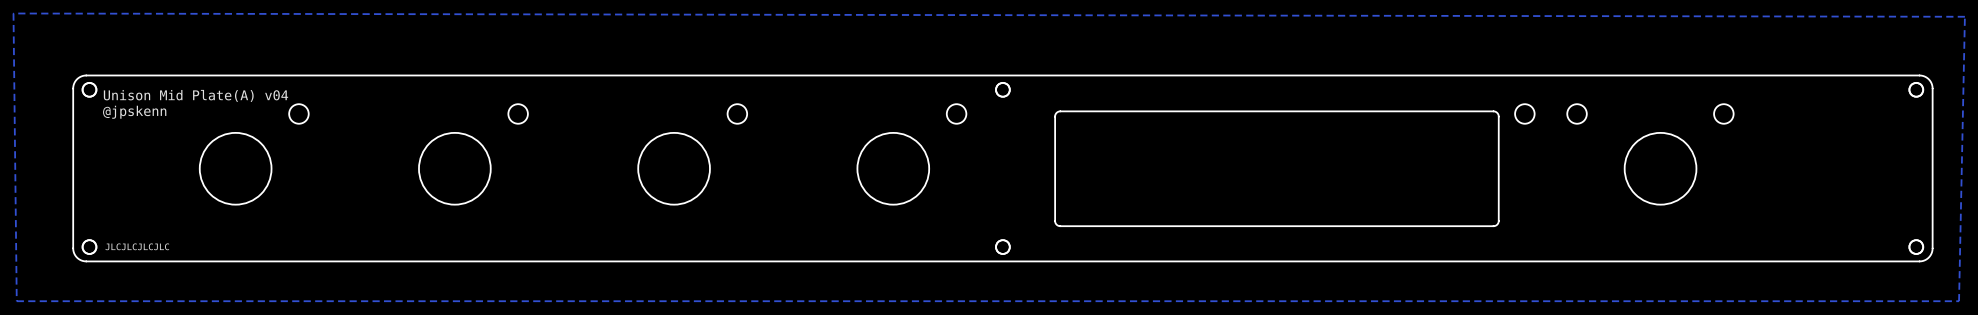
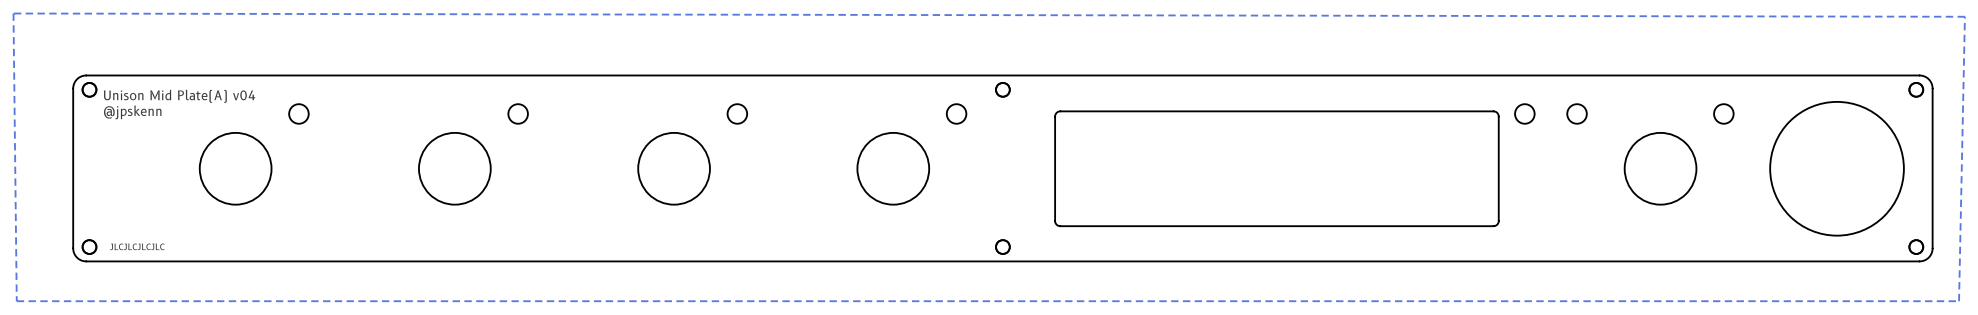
round board edge: none -> [1769, 101, 1905, 237]

